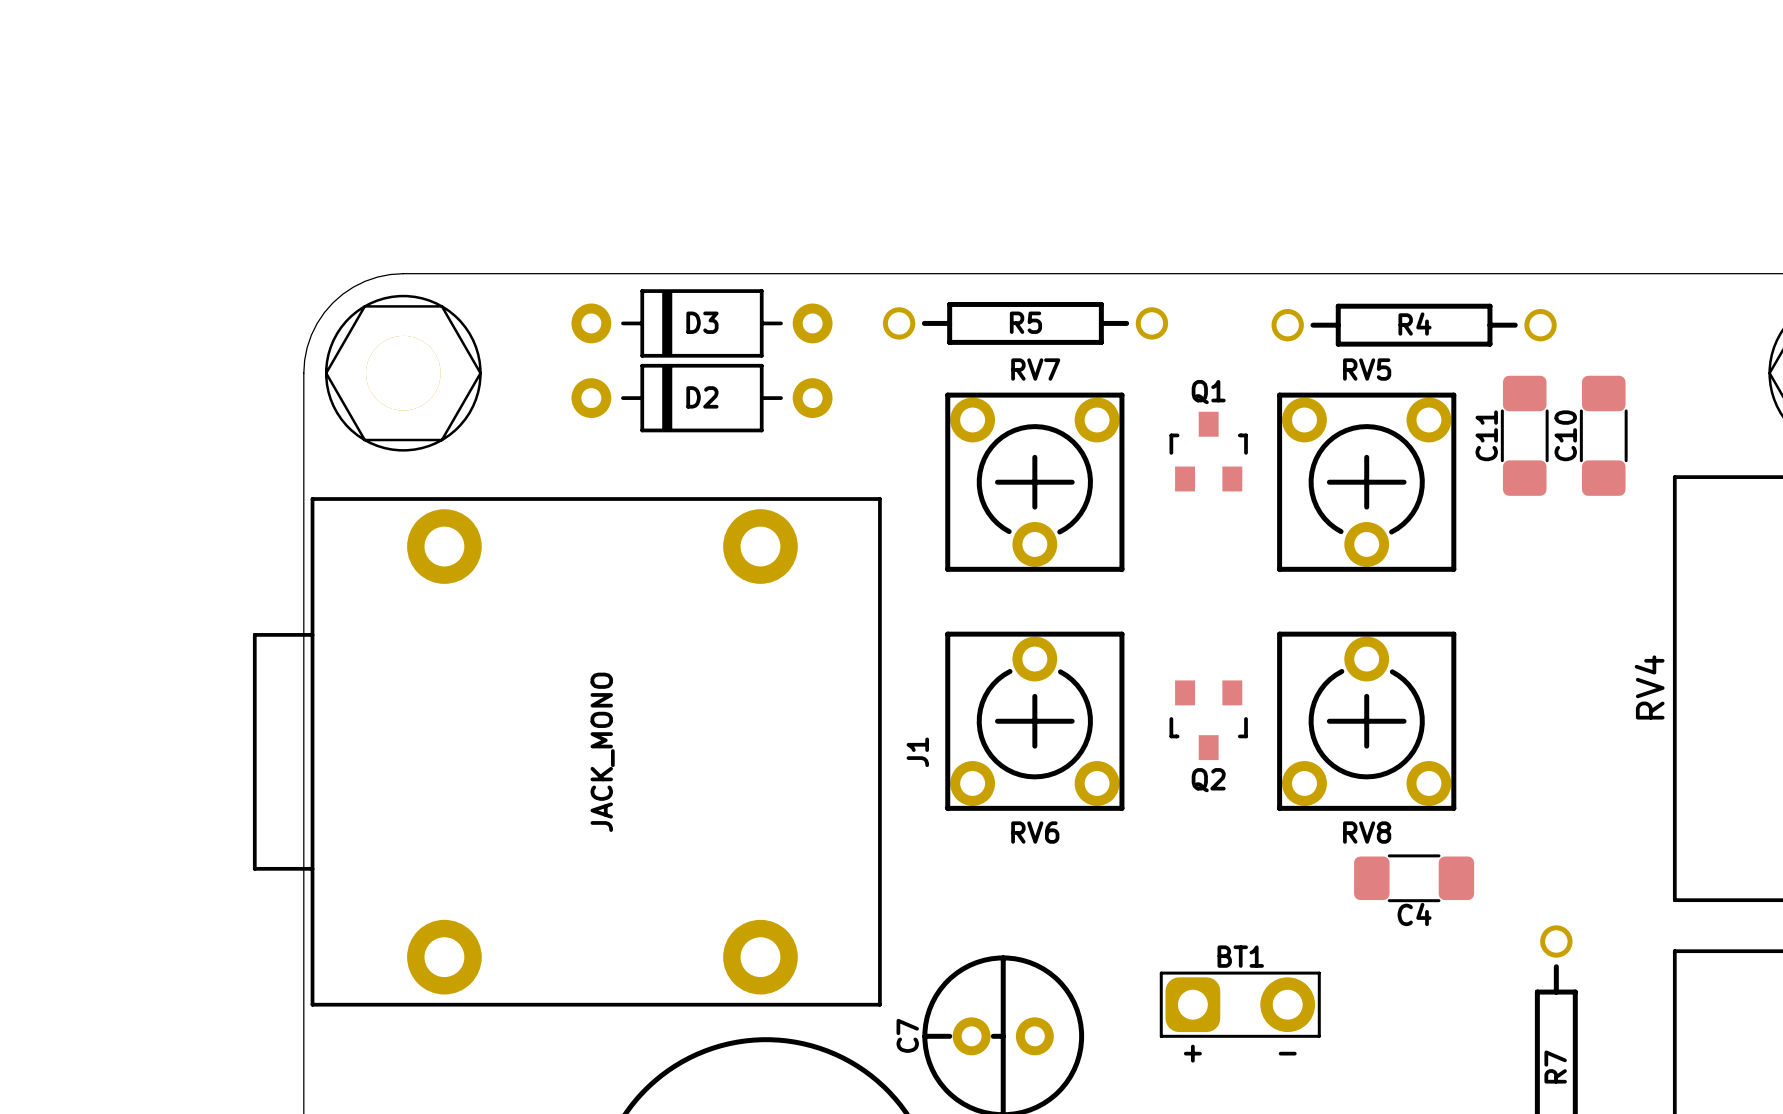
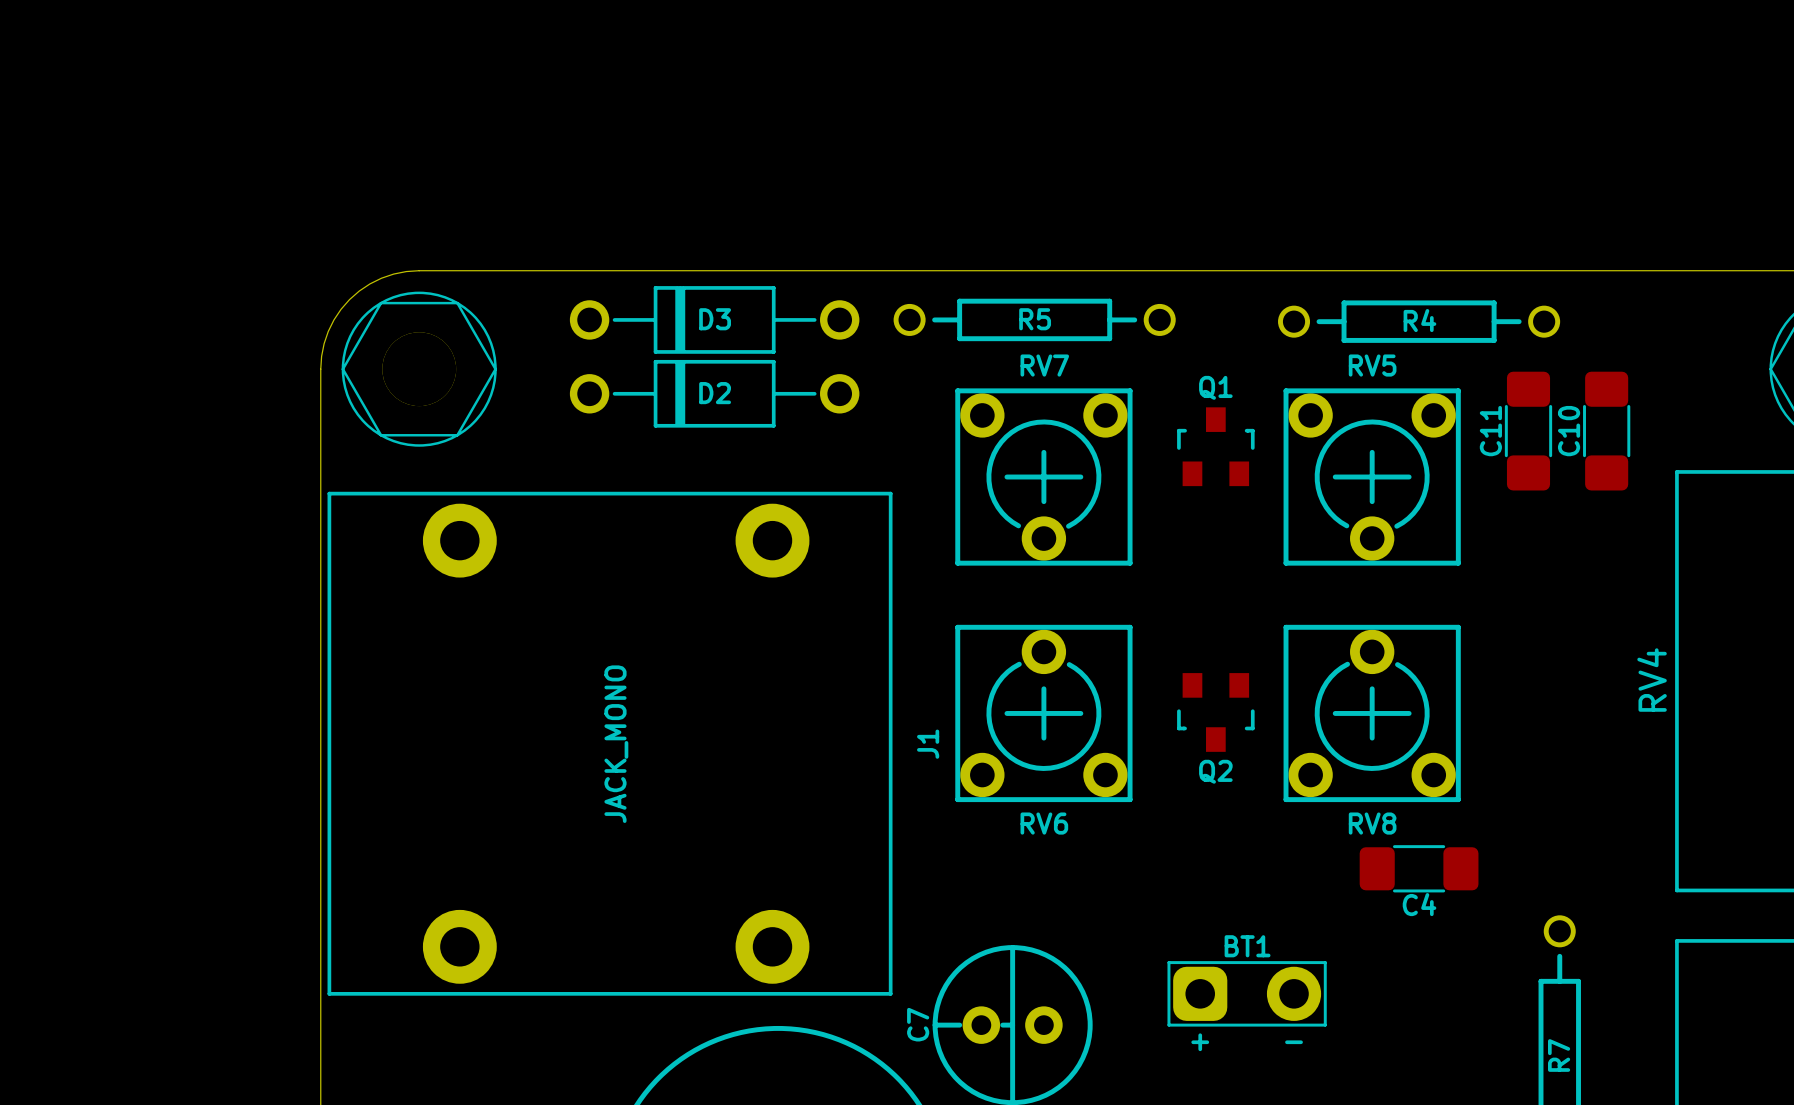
D3 footprint: [571, 289, 833, 358] -> [569, 286, 860, 354]
D2 footprint: [571, 363, 833, 433] -> [569, 359, 860, 428]
J1 footprint: [252, 497, 882, 1007] -> [327, 491, 893, 996]

